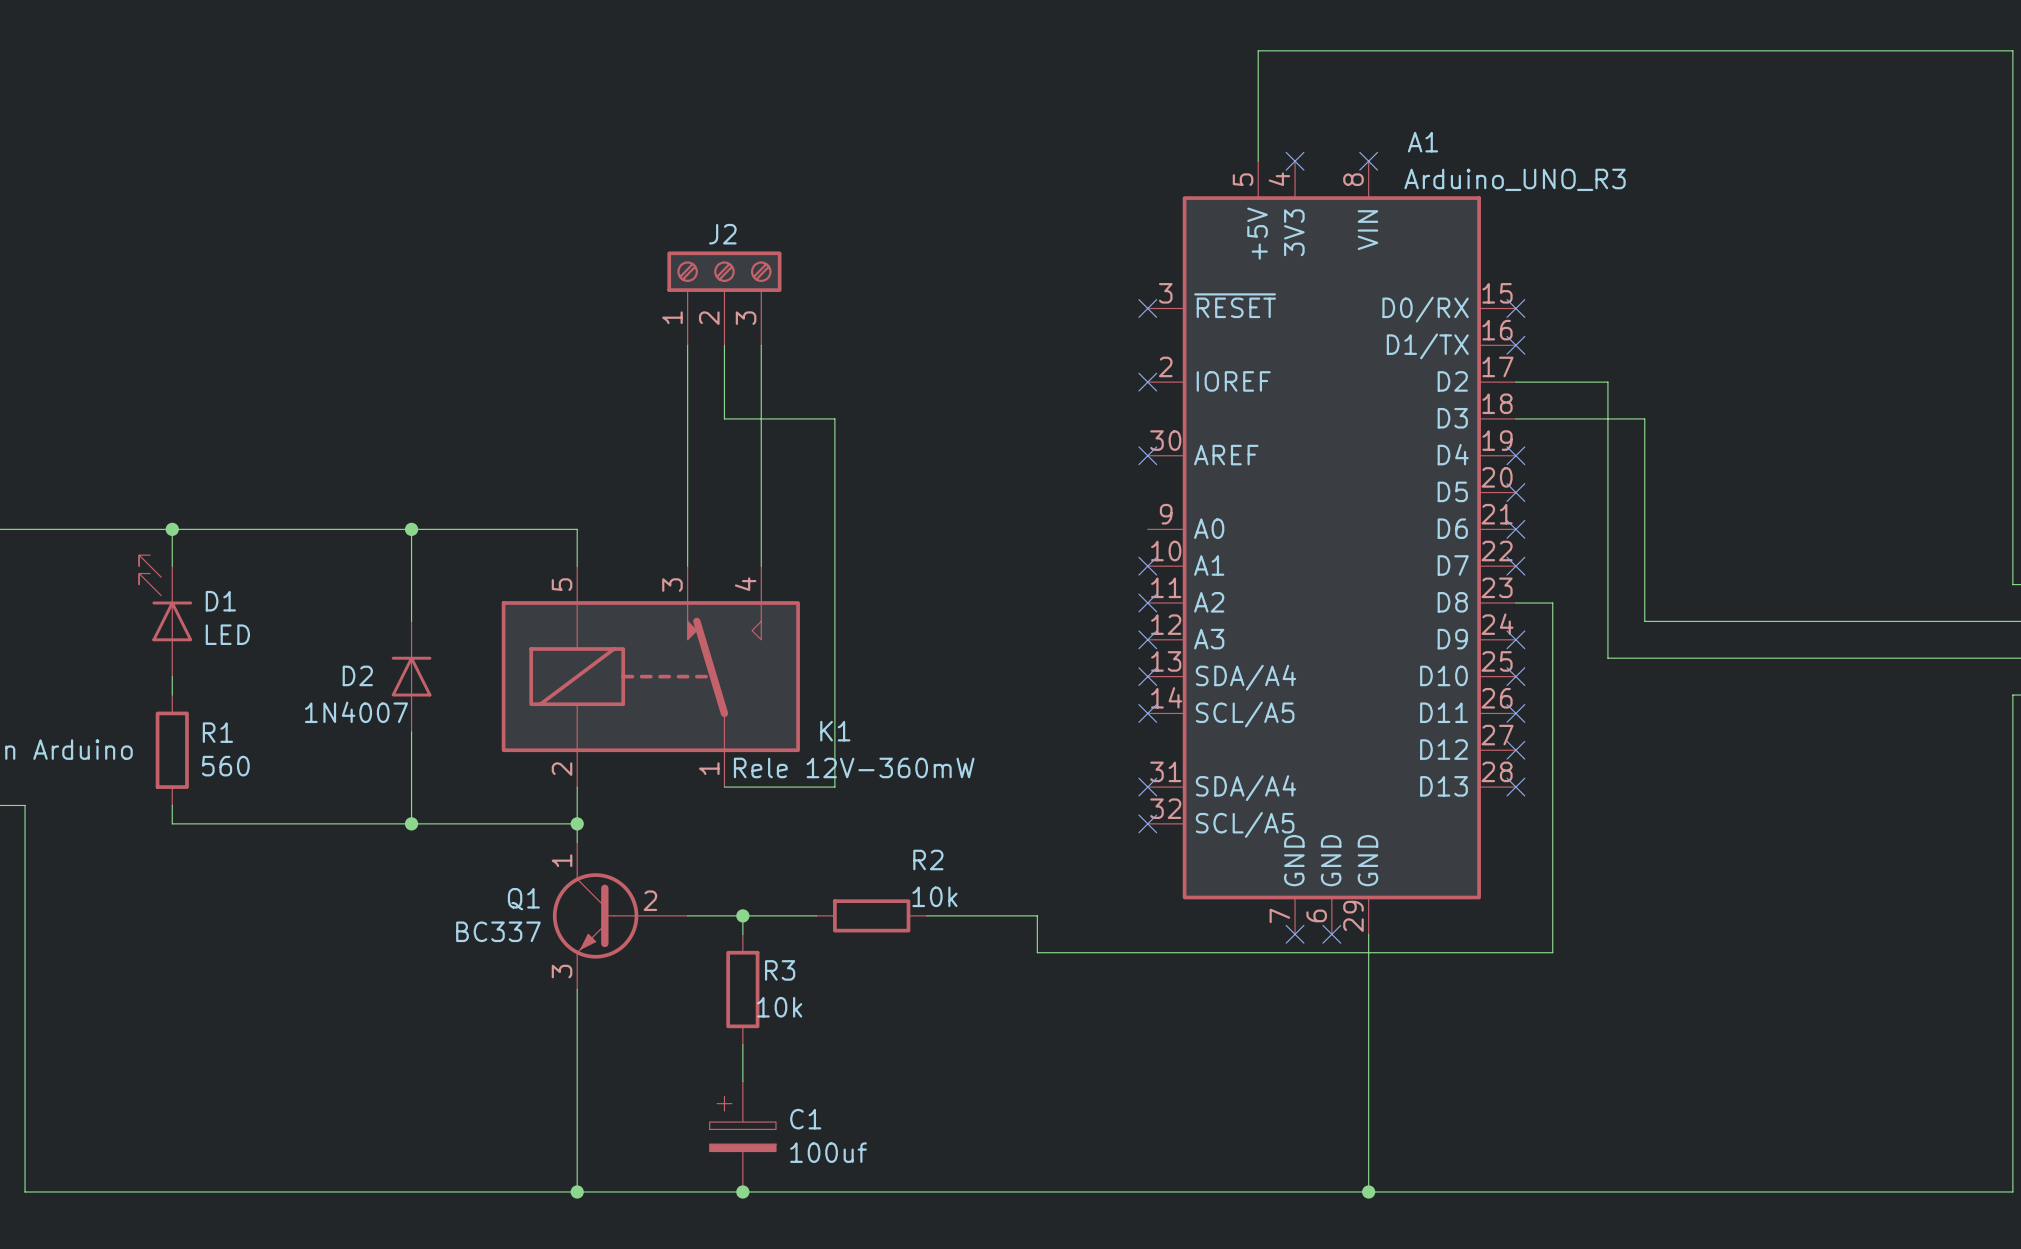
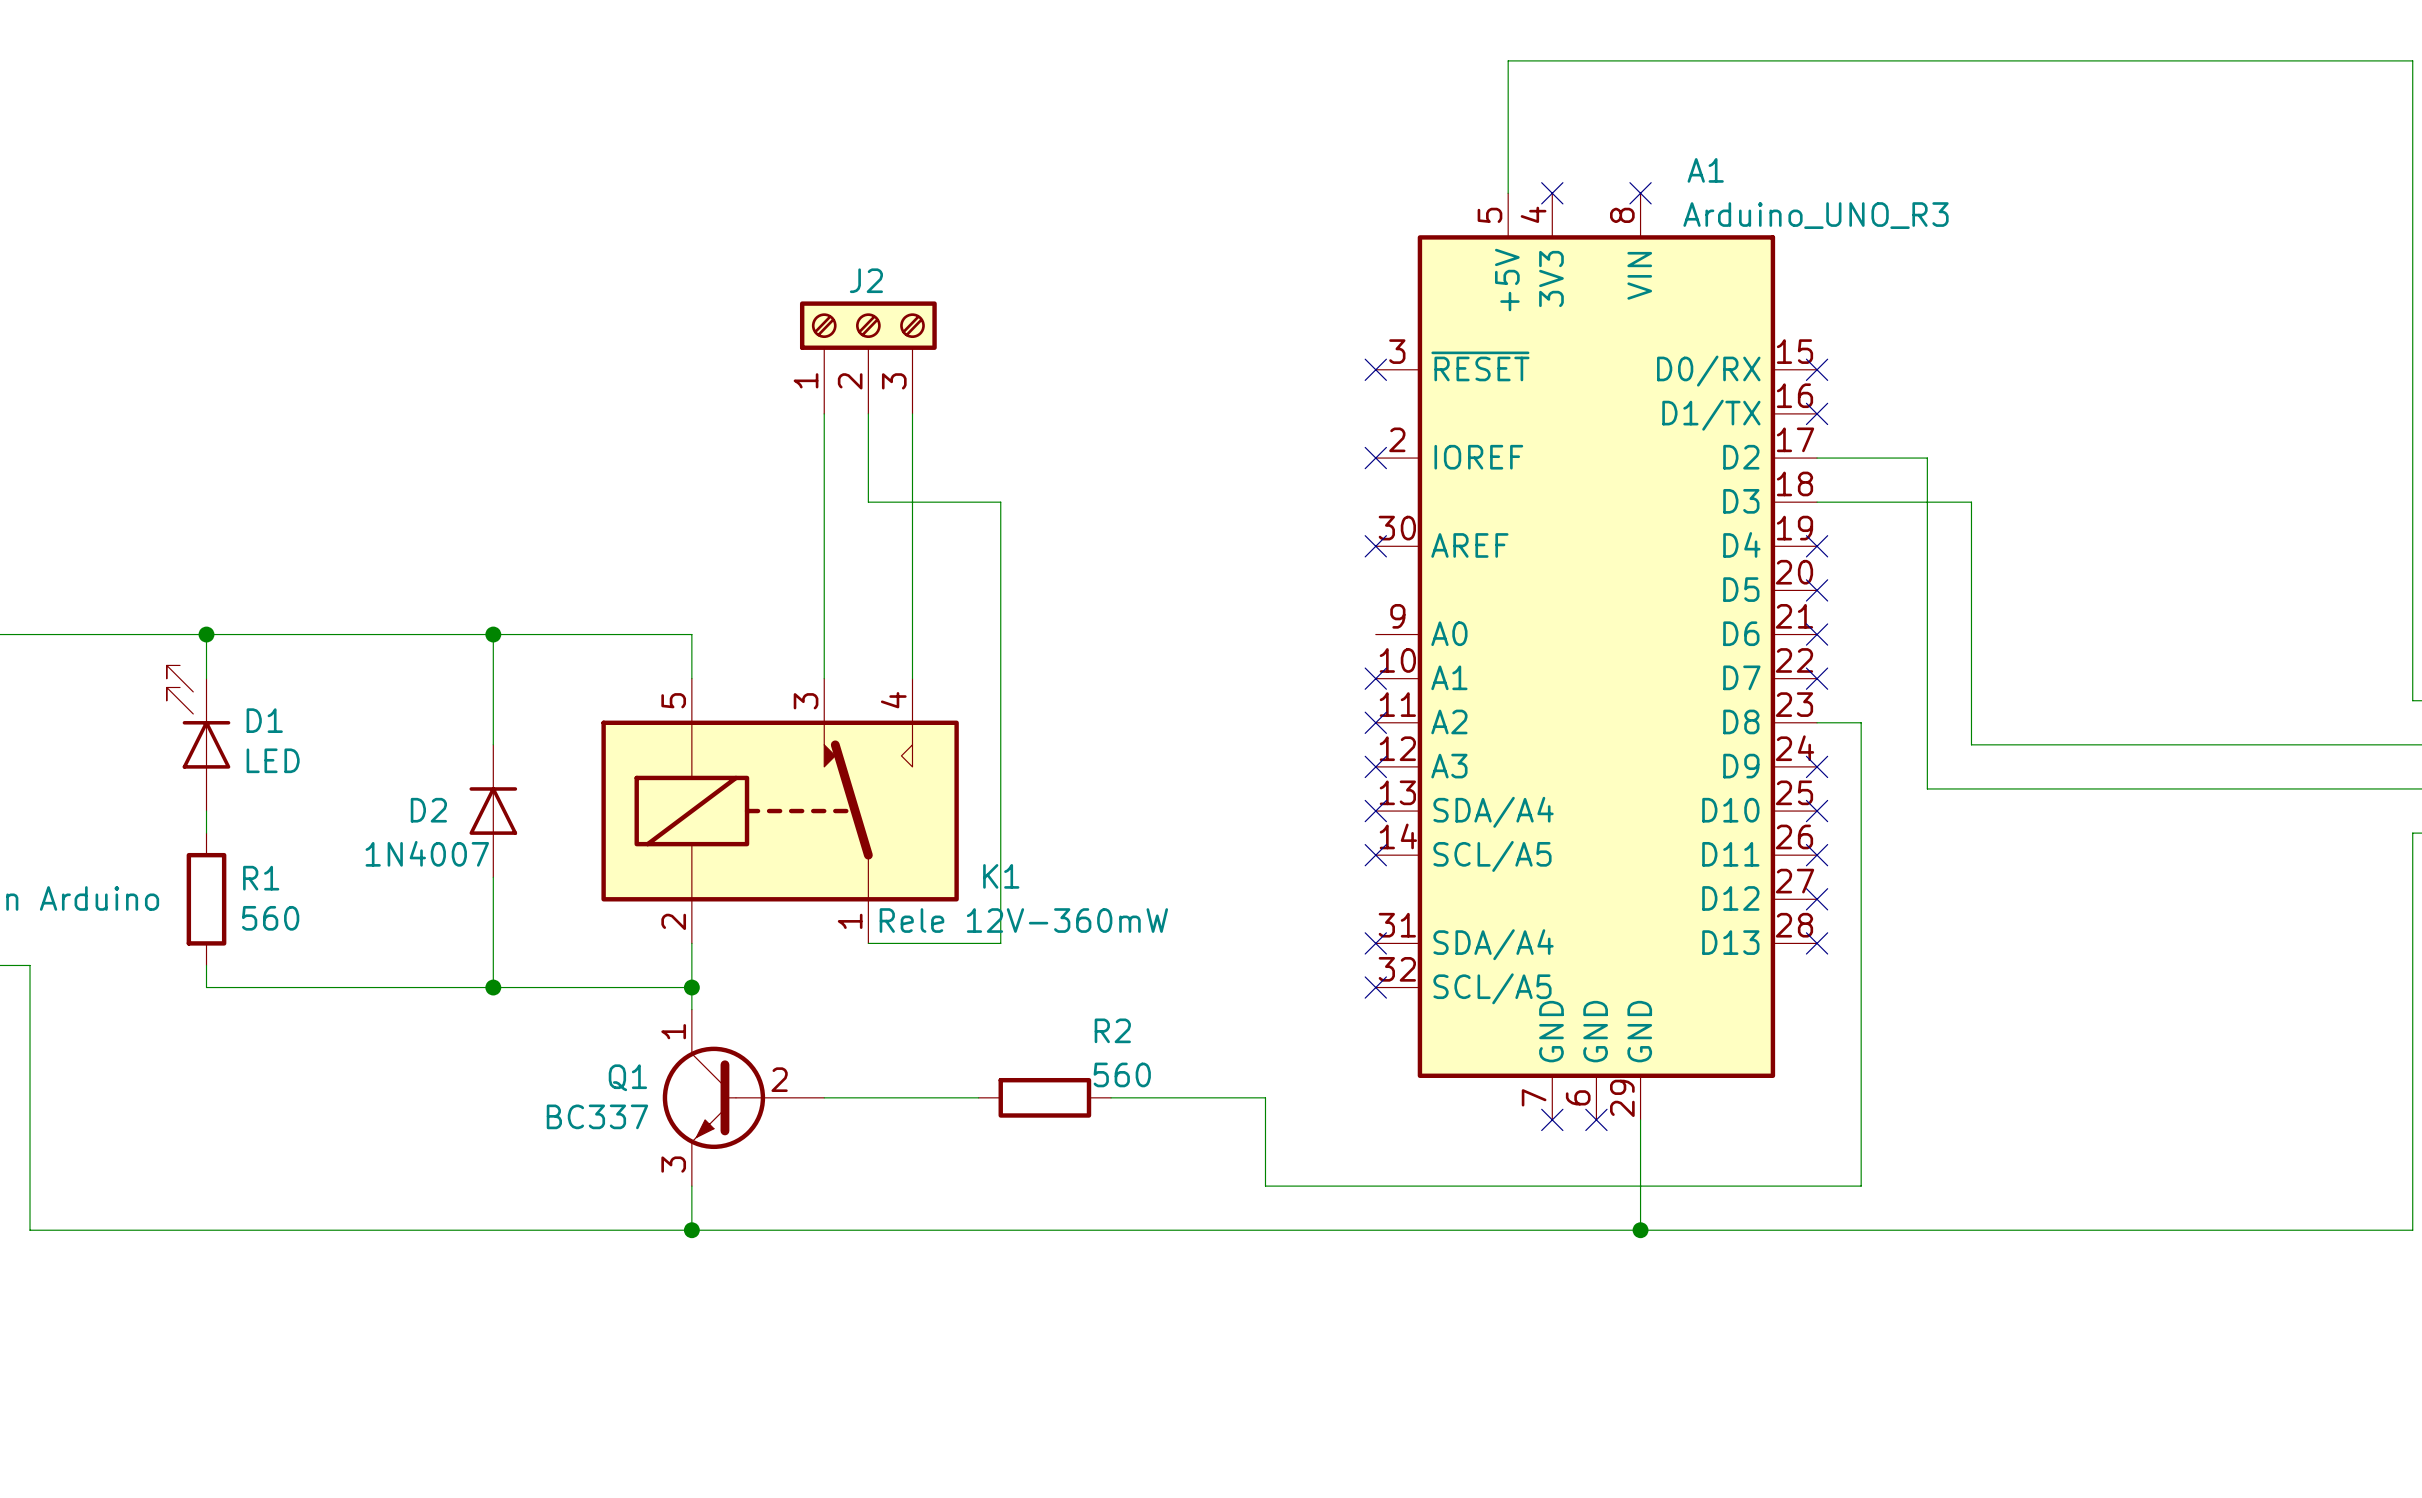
R2 value: 10k (934, 896) -> 560 (1122, 1074)
wire: (742, 915) (742, 934) -> none
junction: (742, 915) -> none
wire: (1037, 915) (1037, 952) (1552, 952) -> (1243, 1097) (1265, 1097) (1265, 1186) (1861, 1186) (1861, 1141)
R3: 10k (742, 989) -> none
wire: (25, 1026) (25, 1191) (2012, 1191) (2012, 1026) -> (30, 1230) (2412, 1230)
wire: (577, 1026) (577, 1191) -> none
junction: none -> (691, 1230)
wire: (1368, 1026) (1368, 1191) -> none
junction: none -> (1640, 1230)
wire: (742, 1044) (742, 1081) -> none
C1: 100uf (742, 1136) -> none
junction: (577, 1191) -> none
junction: (742, 1191) -> none
junction: (1368, 1191) -> none

